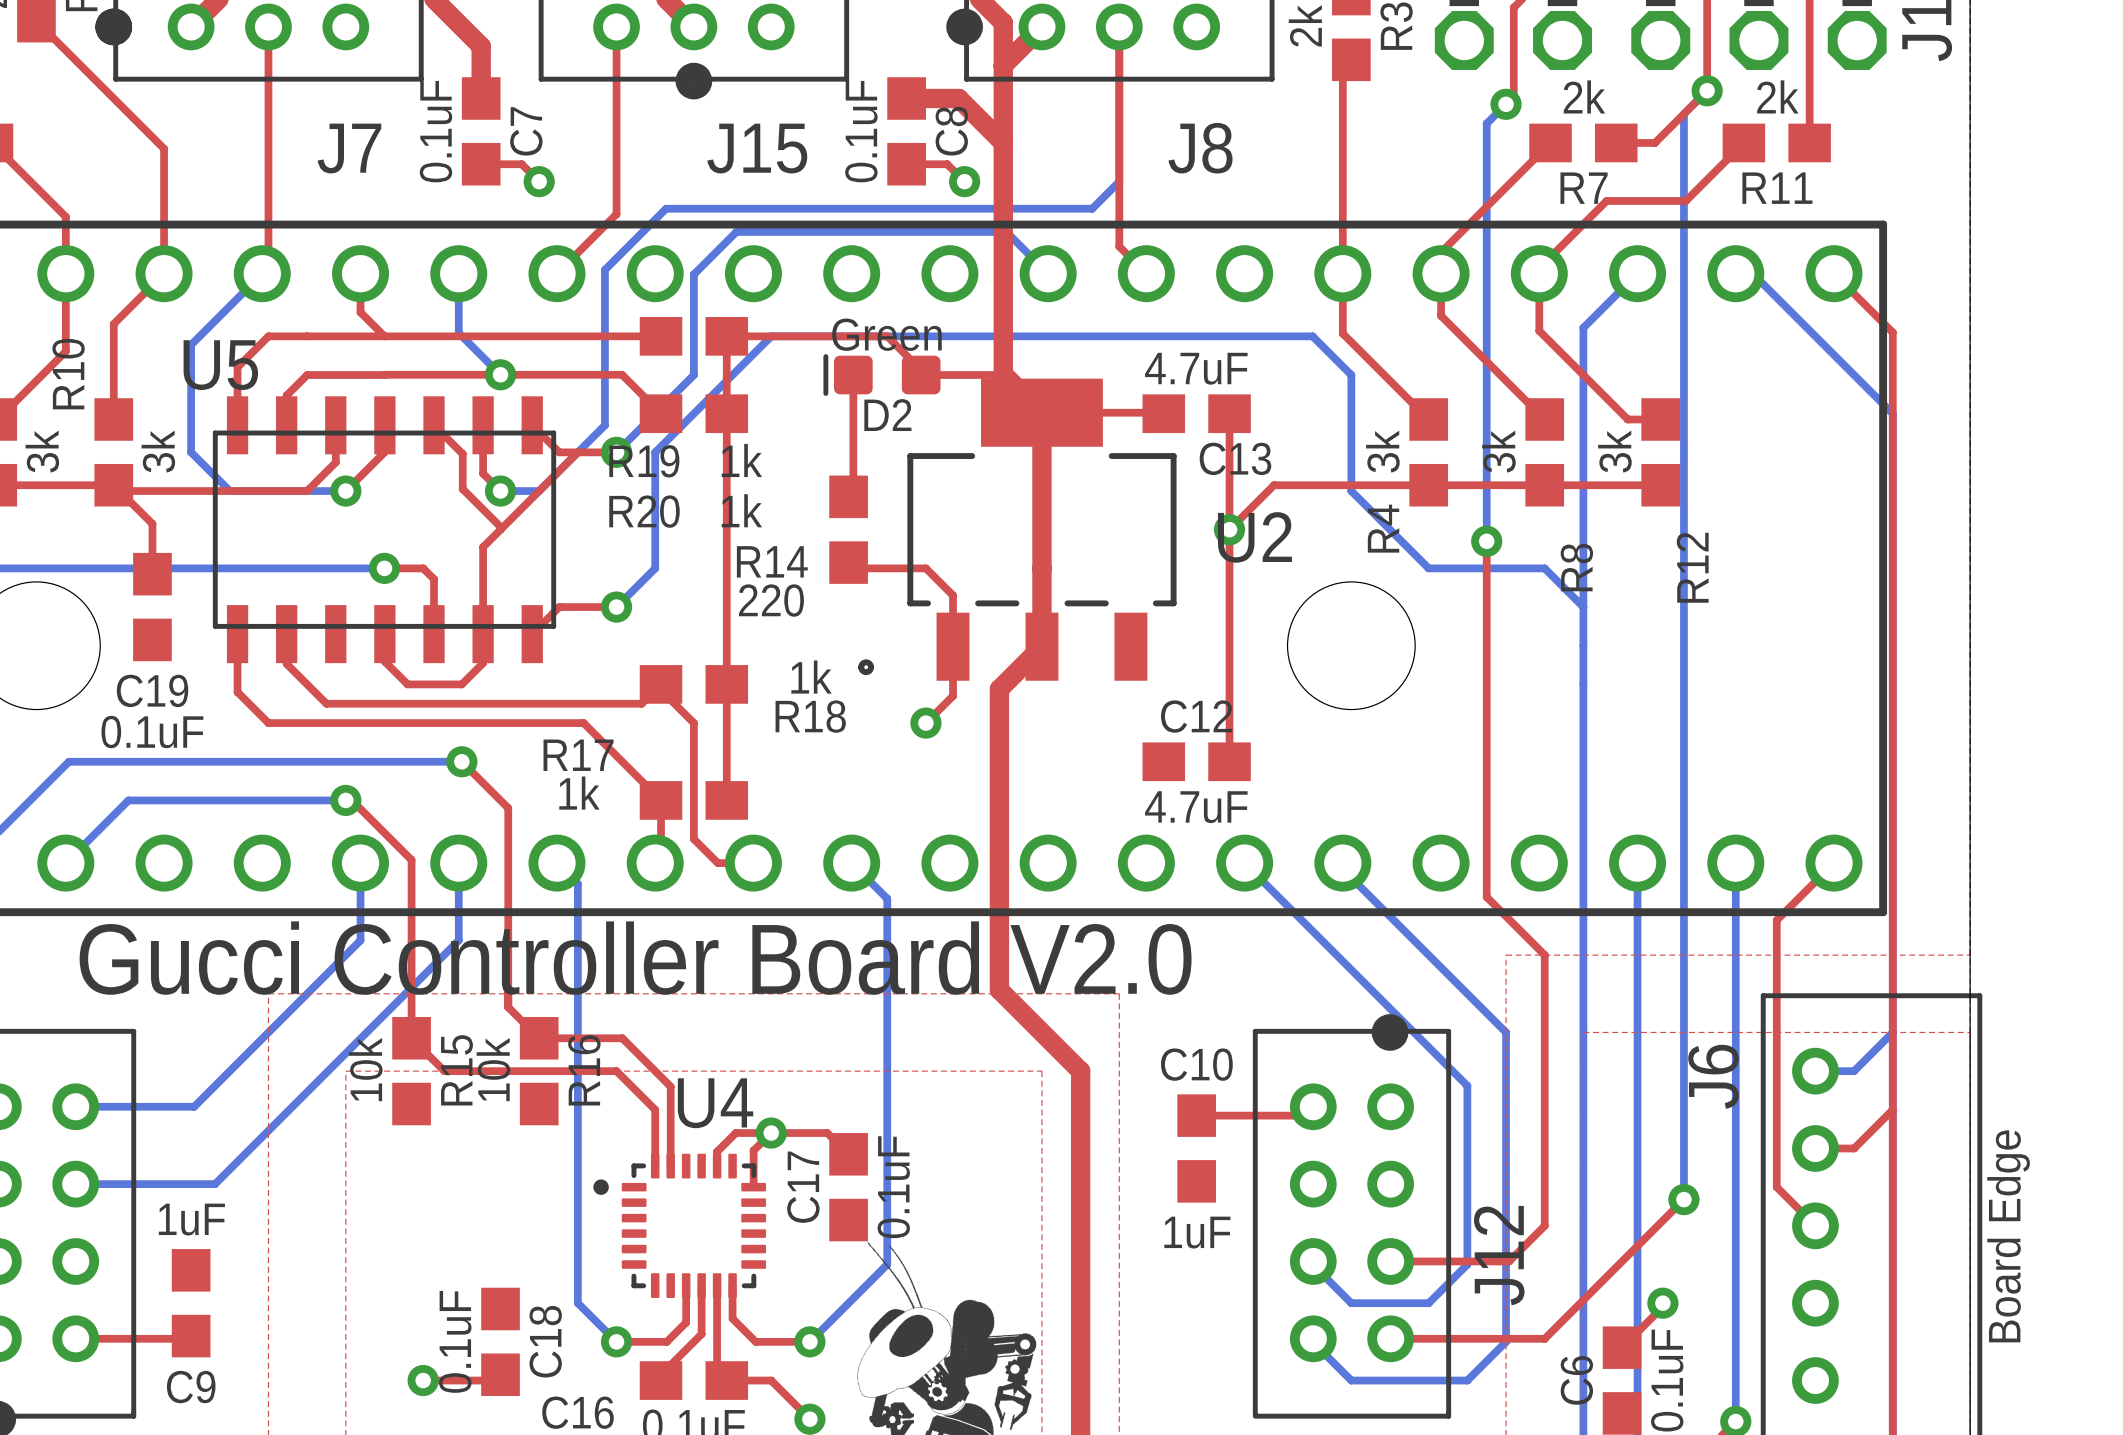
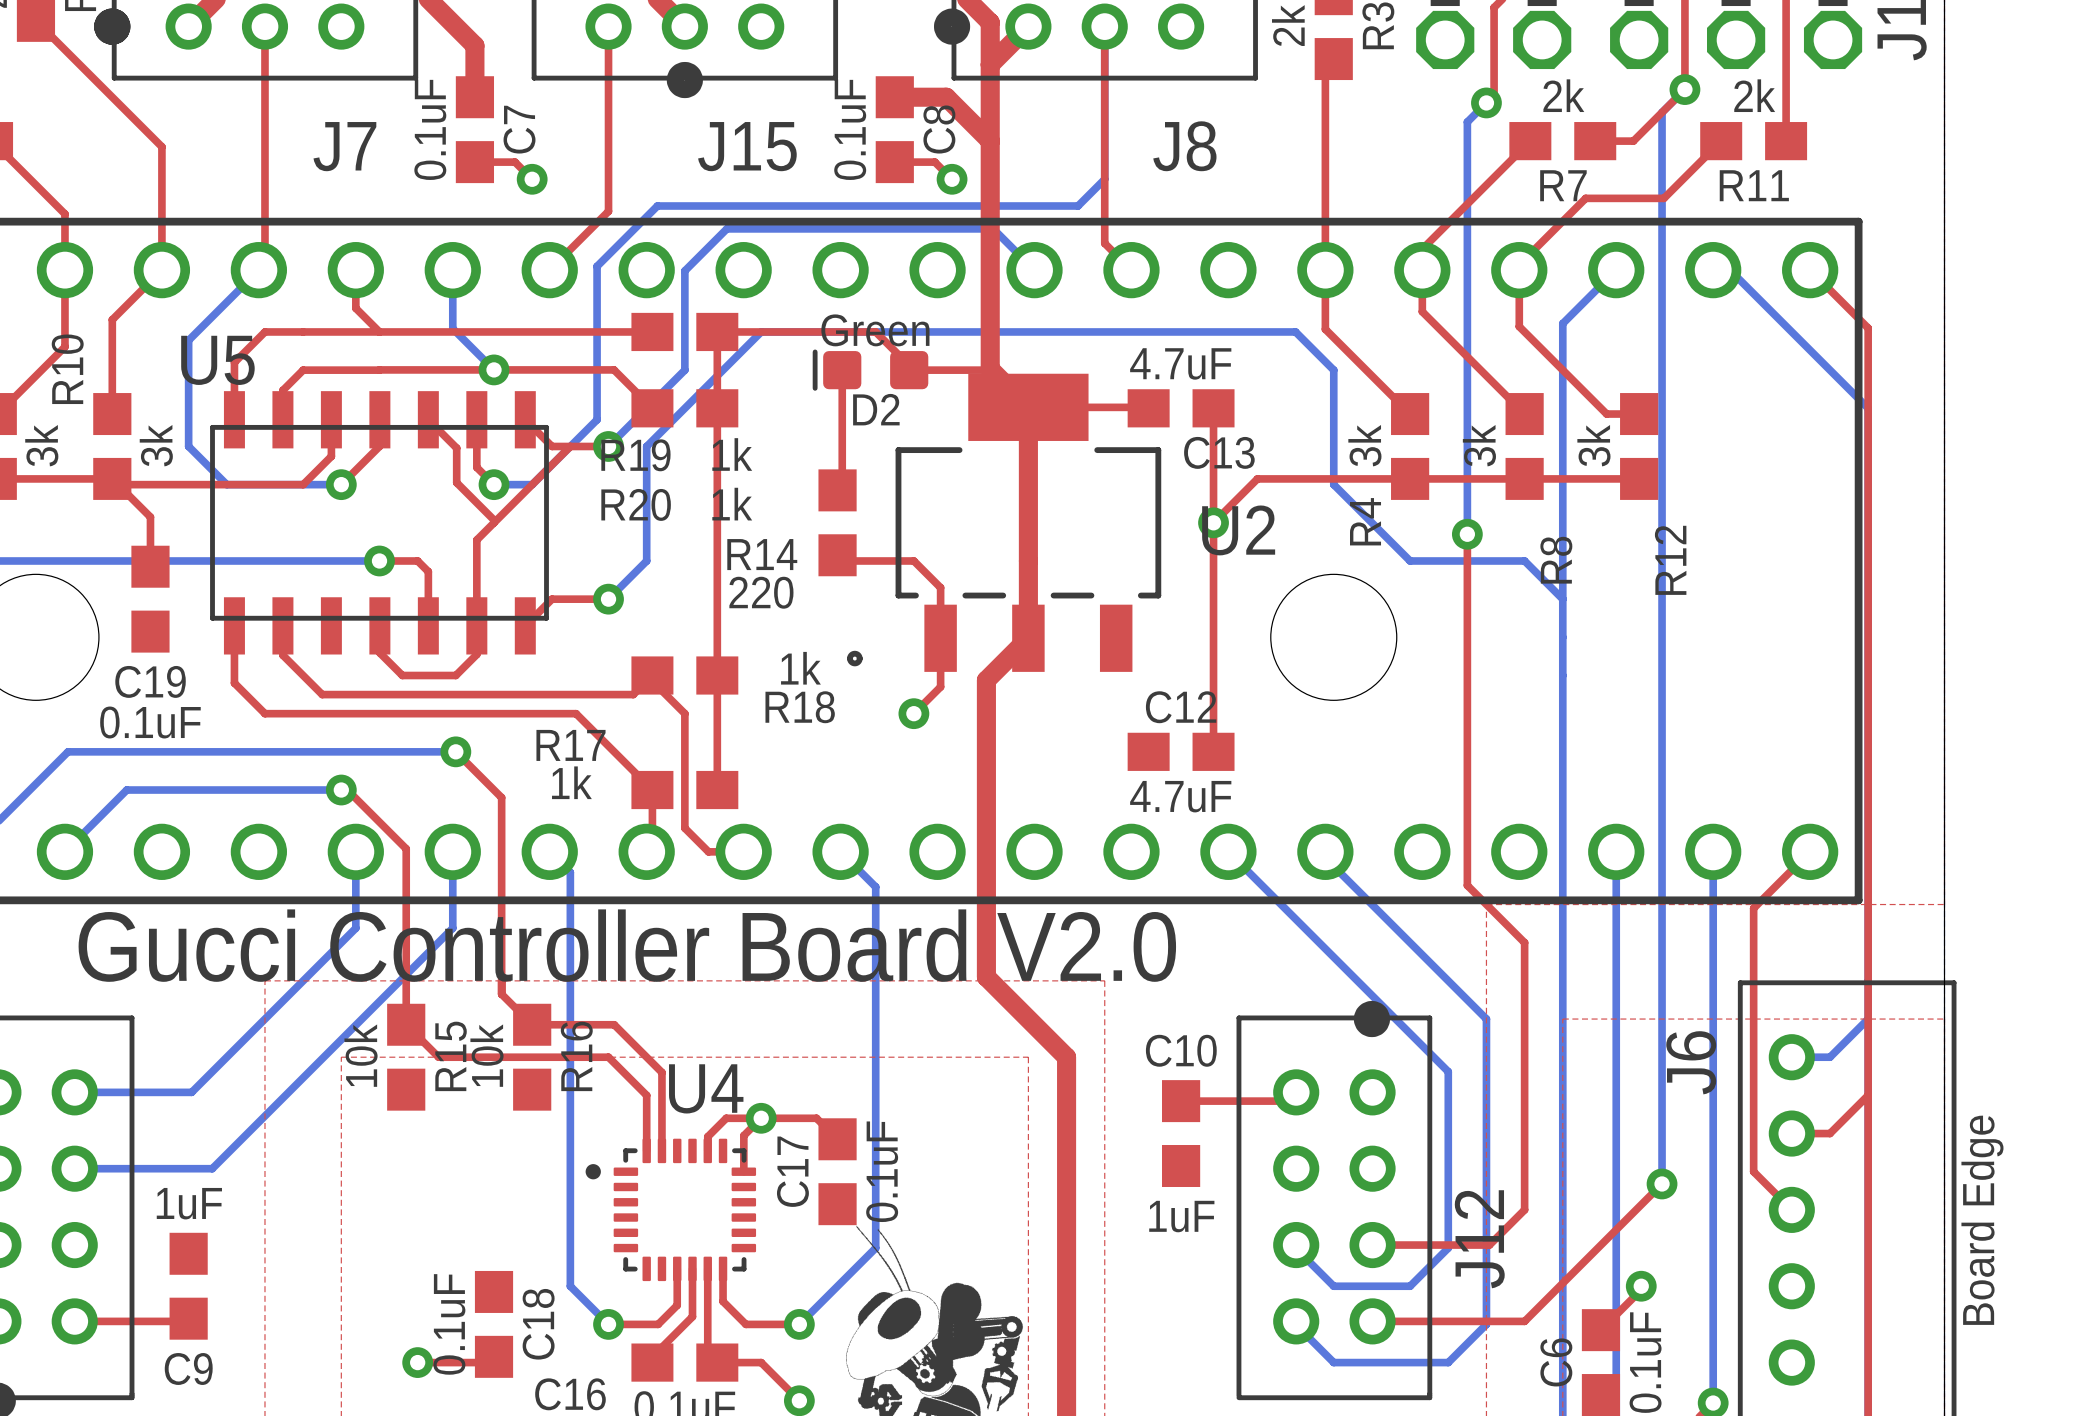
top zone outline: (1970, 916) (1970, 955) (1506, 955) -> (1944, 904) (1486, 904) (1486, 942)

